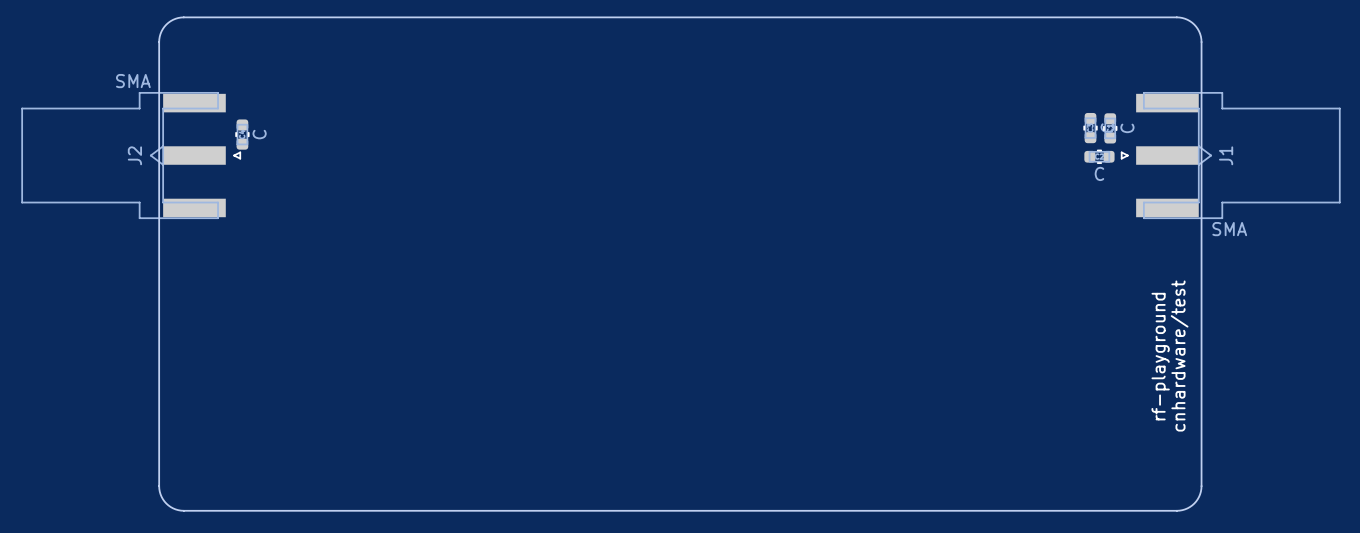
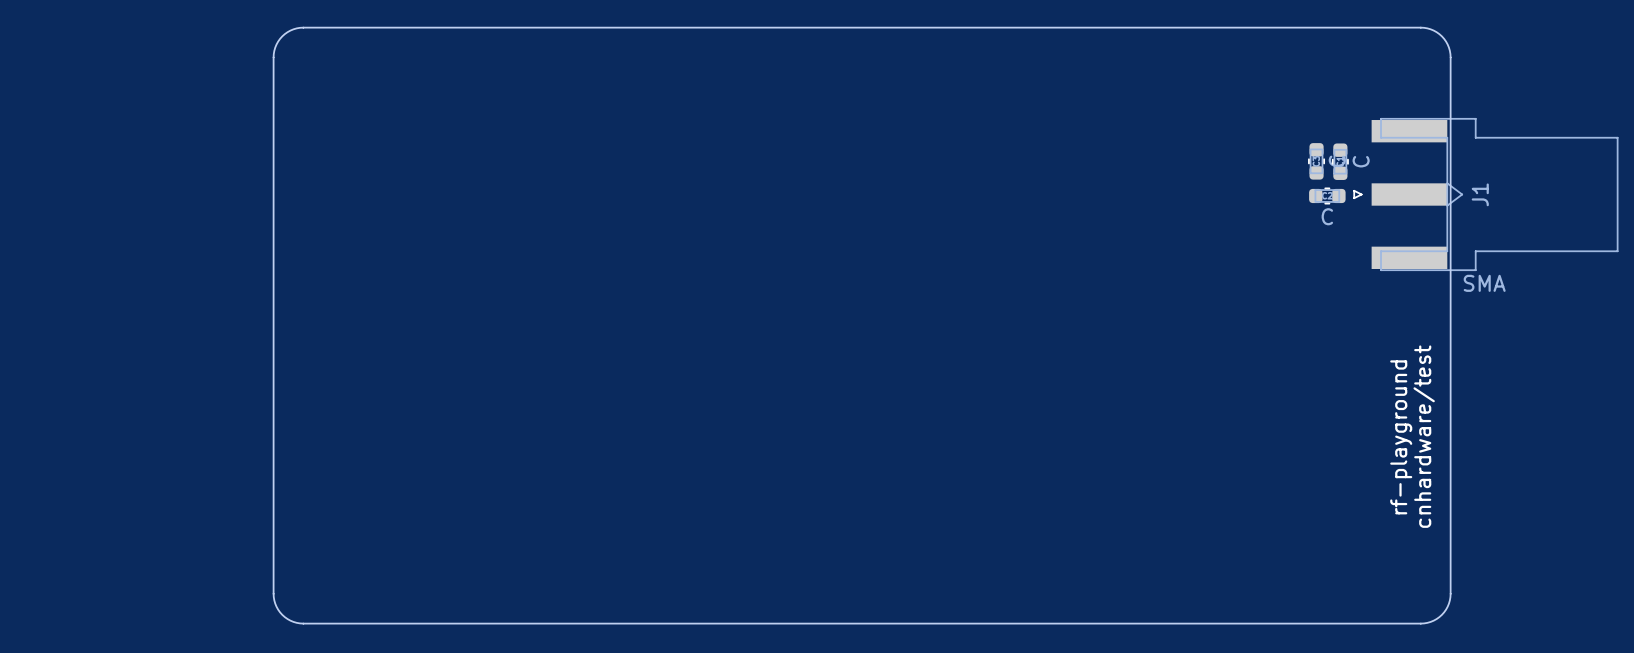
board edge: (251, 17) (178, 17) (164, 26) (159, 42) (159, 491) (166, 503) (178, 510) (251, 510) -> (303, 27) (290, 30) (282, 36) (276, 44) (273, 57) (273, 593) (275, 603) (282, 614) (290, 620) (303, 623)
part: C (242, 134) -> none
J2: SMA (131, 155) -> none

